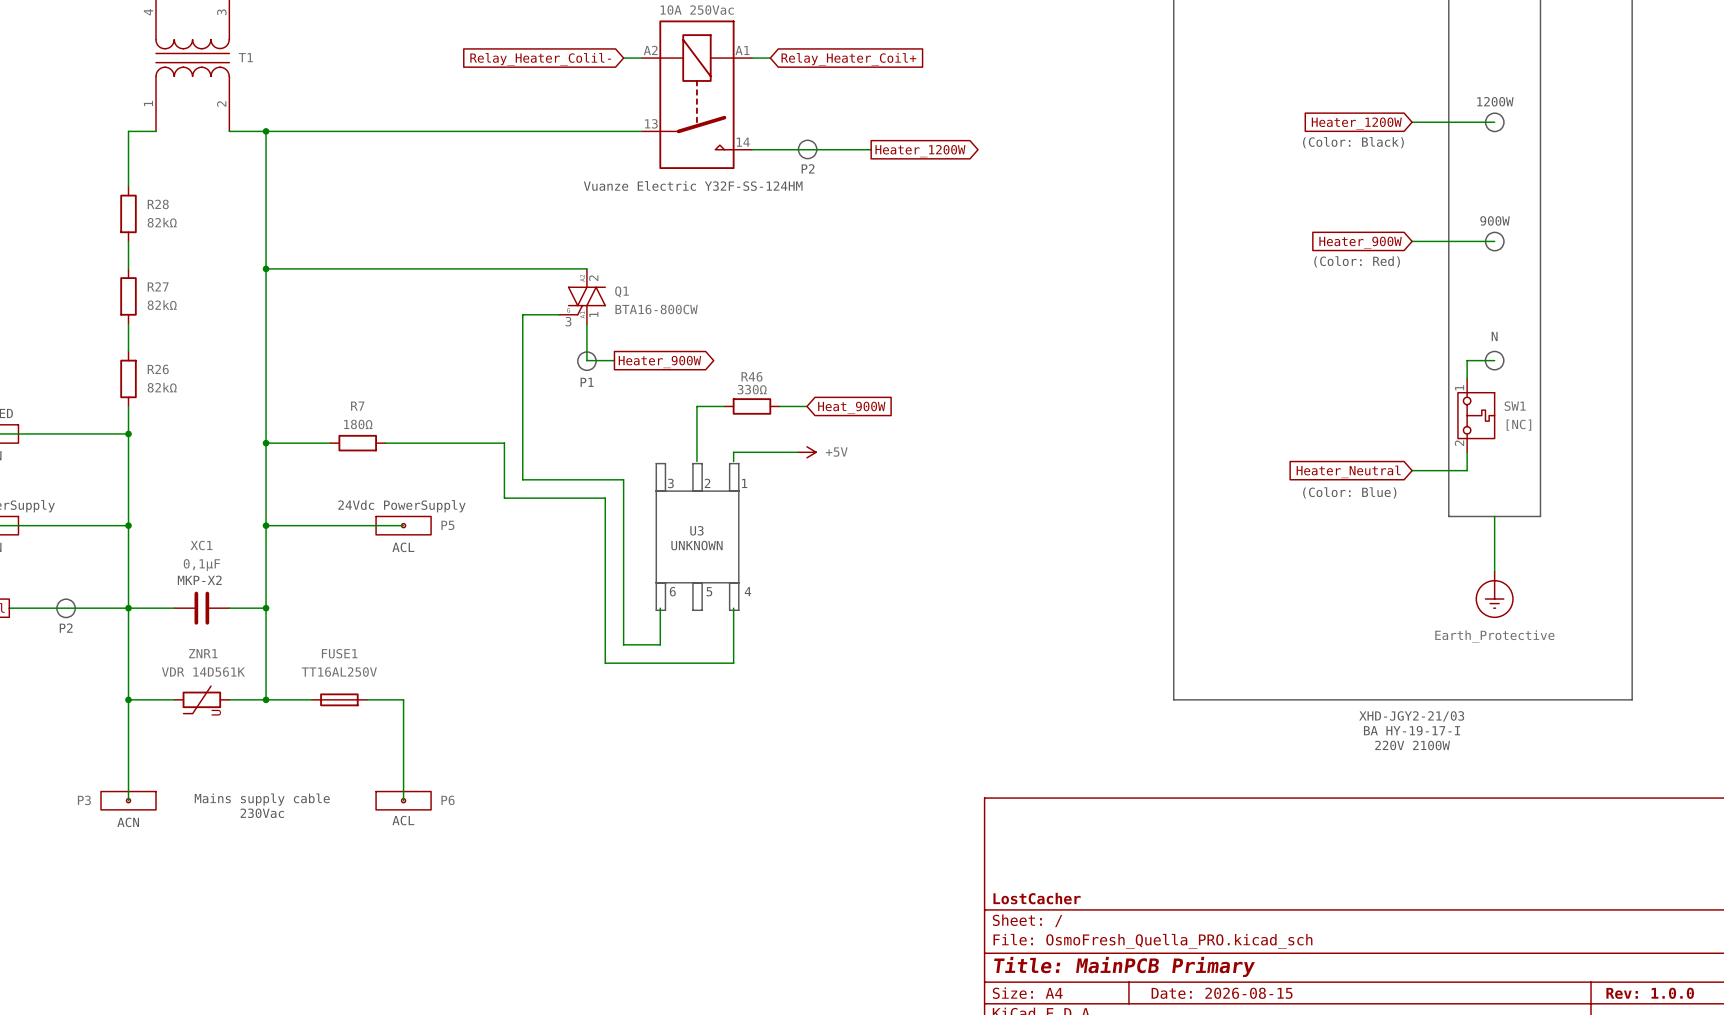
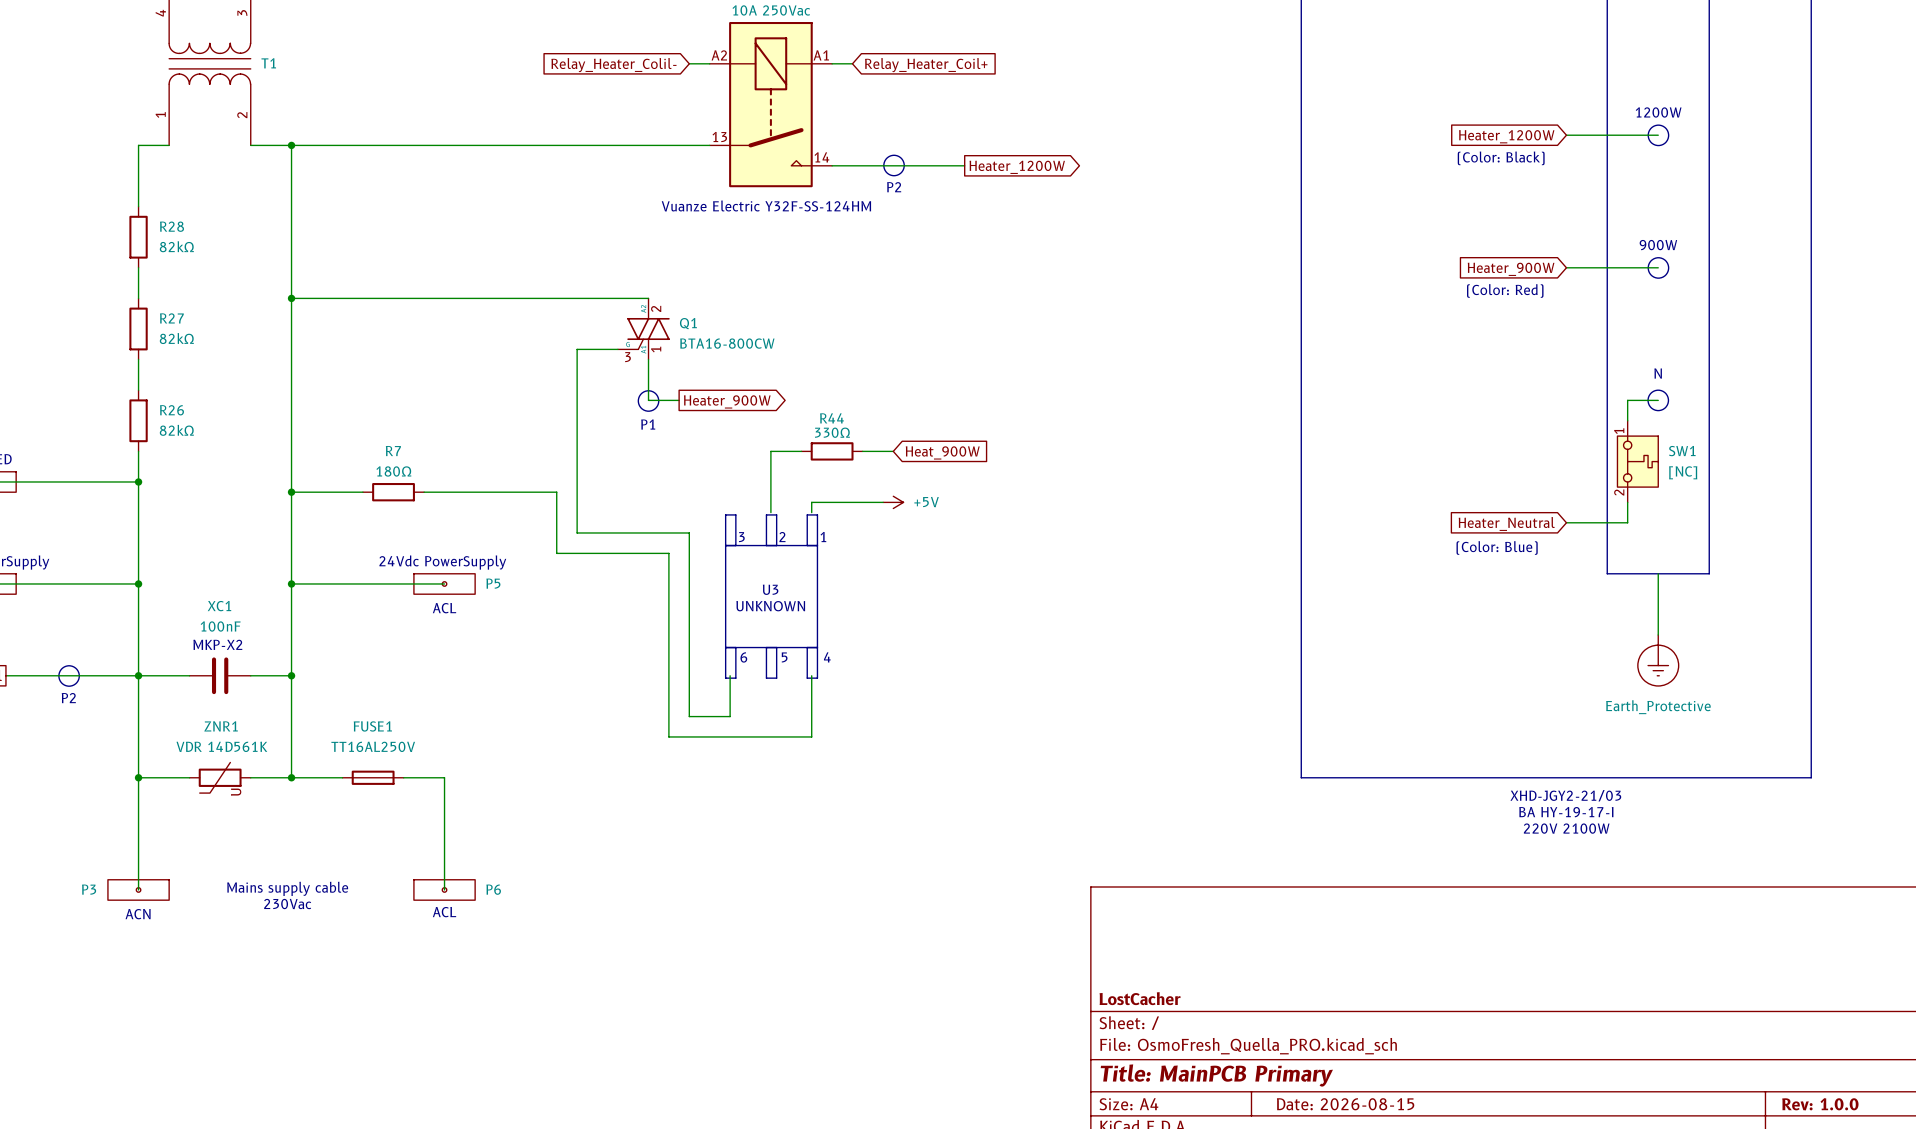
R46 name: R46 (752, 376) -> R44 (831, 418)
XC1 value: 0,1µF (201, 565) -> 100nF (220, 626)

